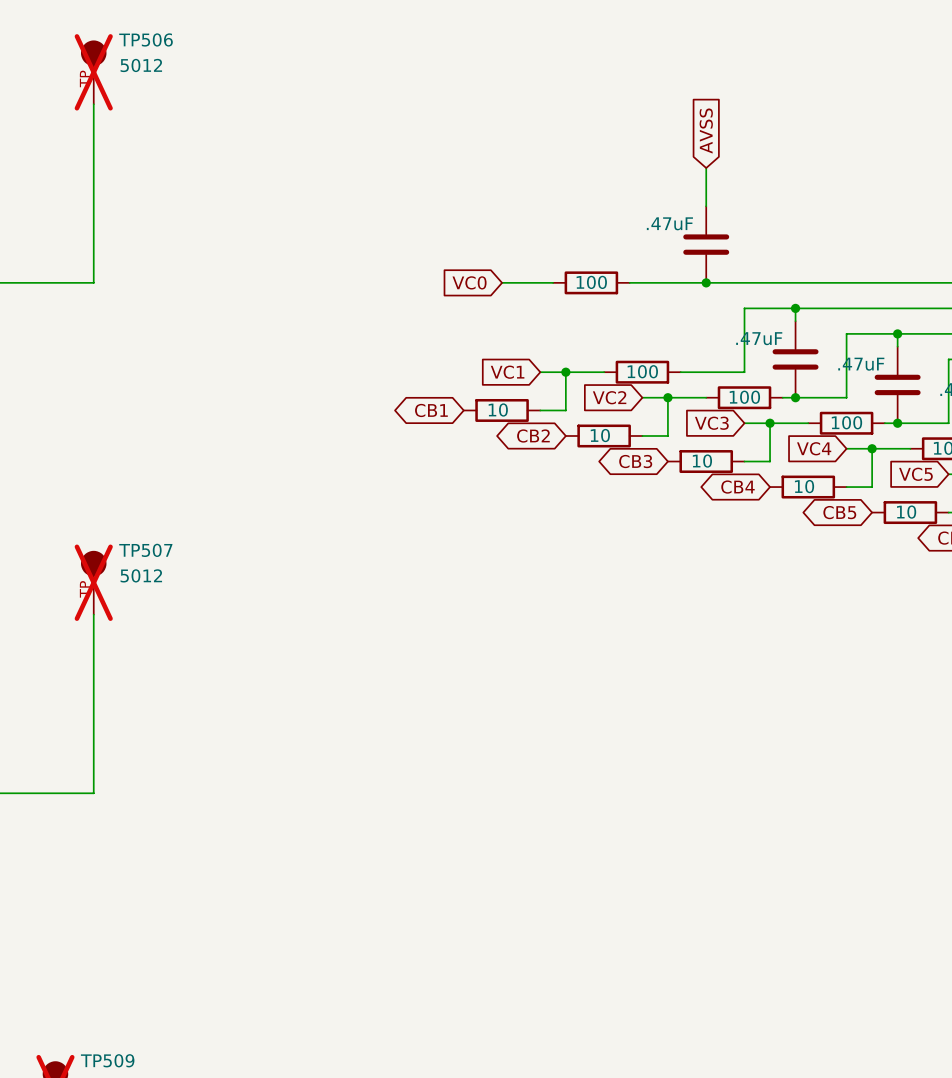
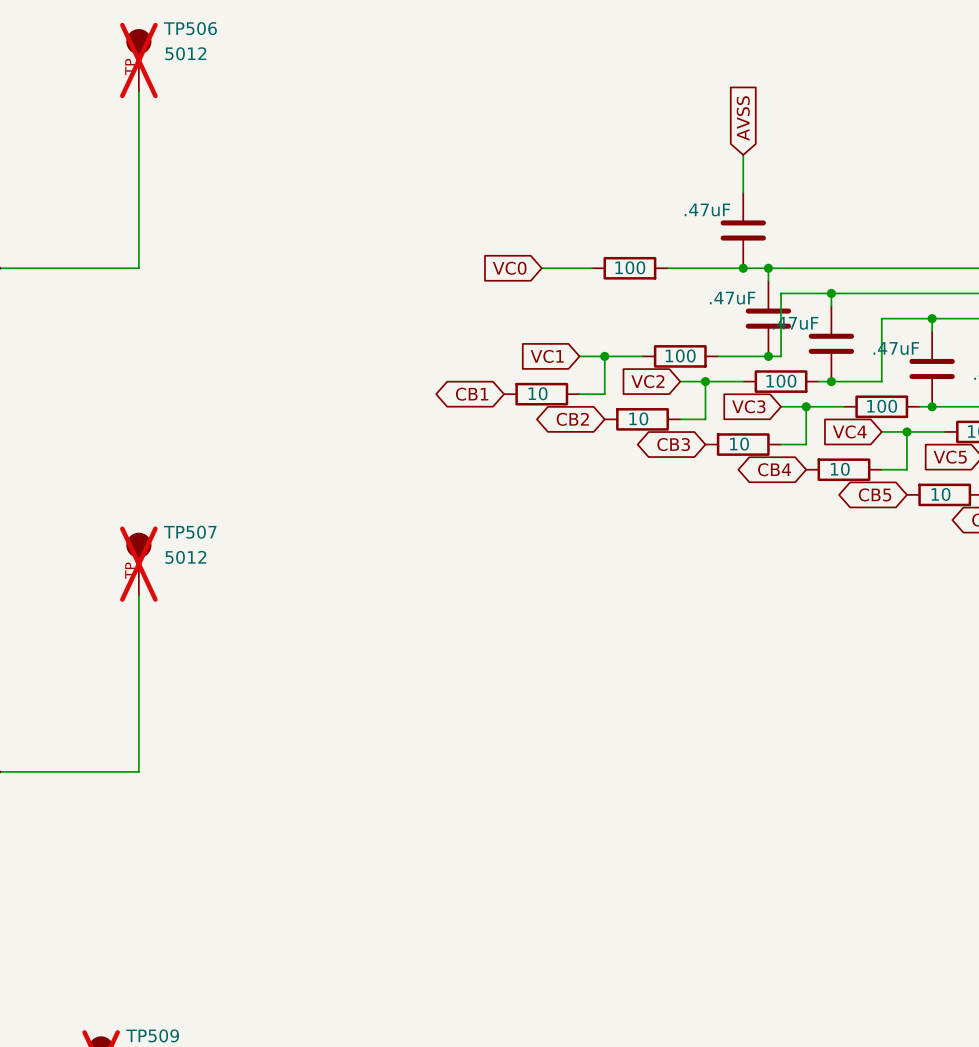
wire: none -> (768, 268) (768, 280)
junction: none -> (768, 268)
part: none -> .47uF (768, 318)
junction: none -> (768, 356)

